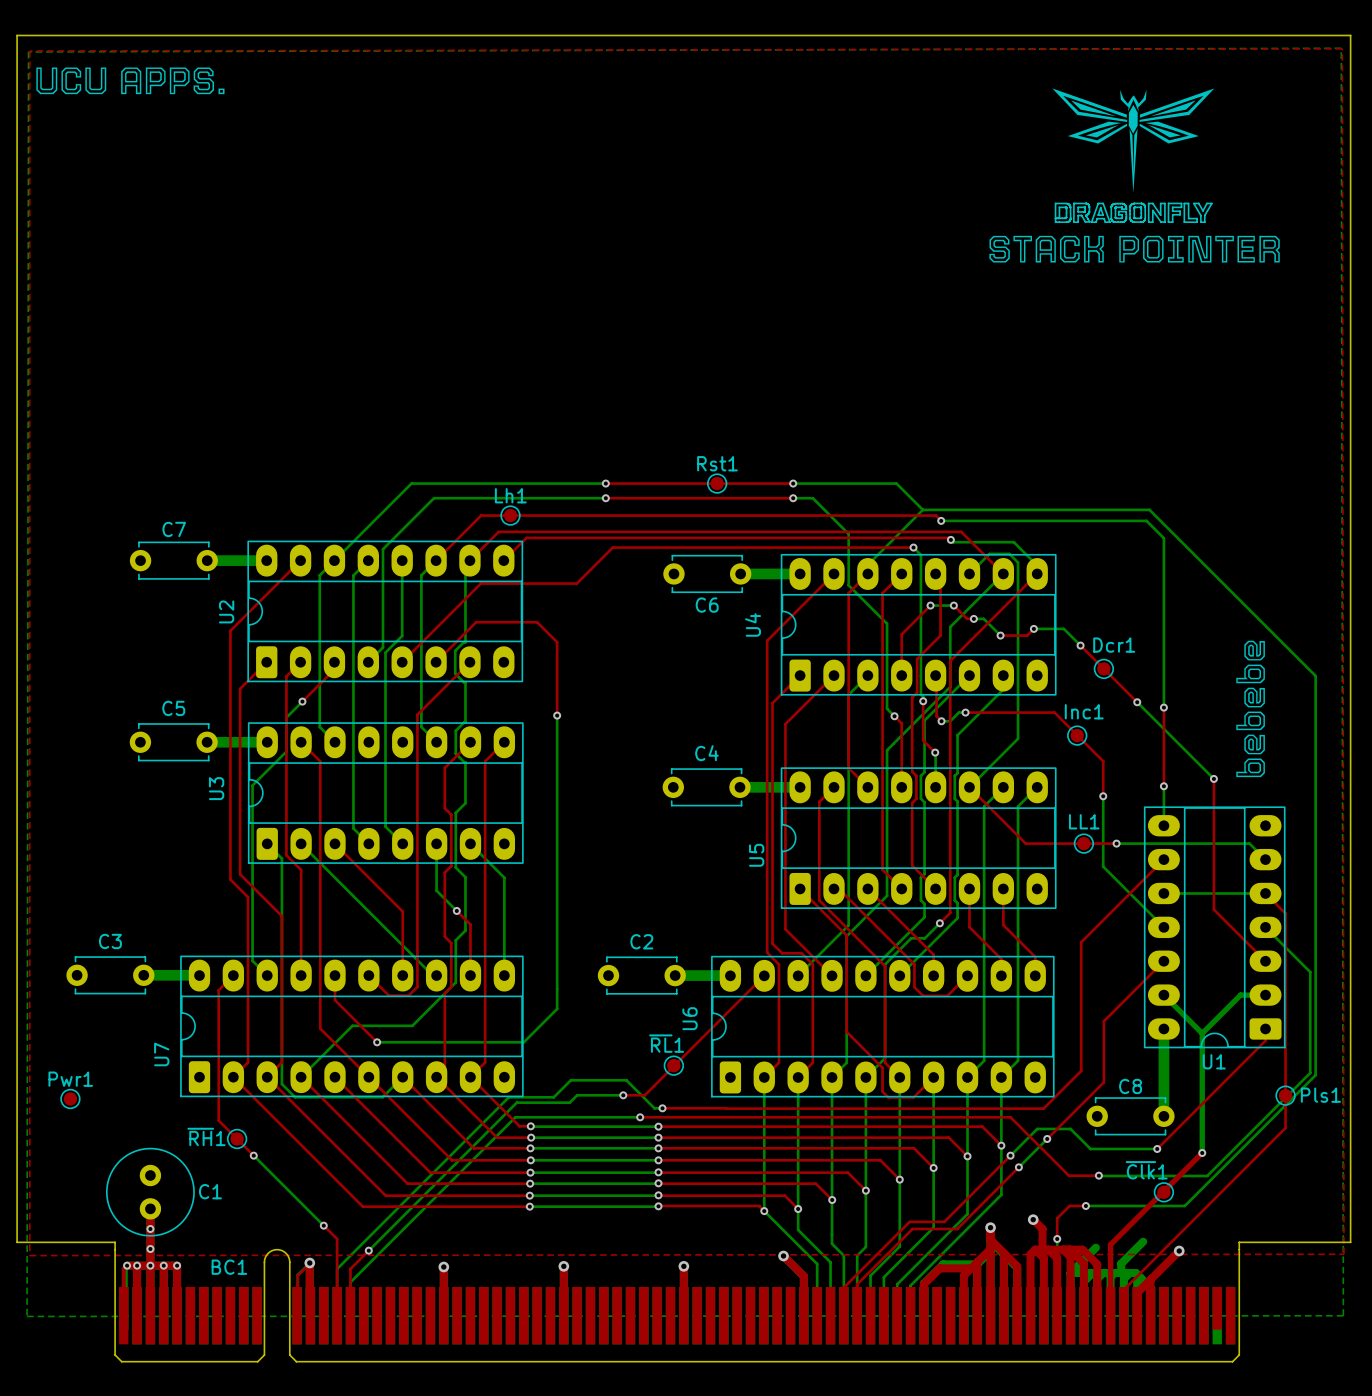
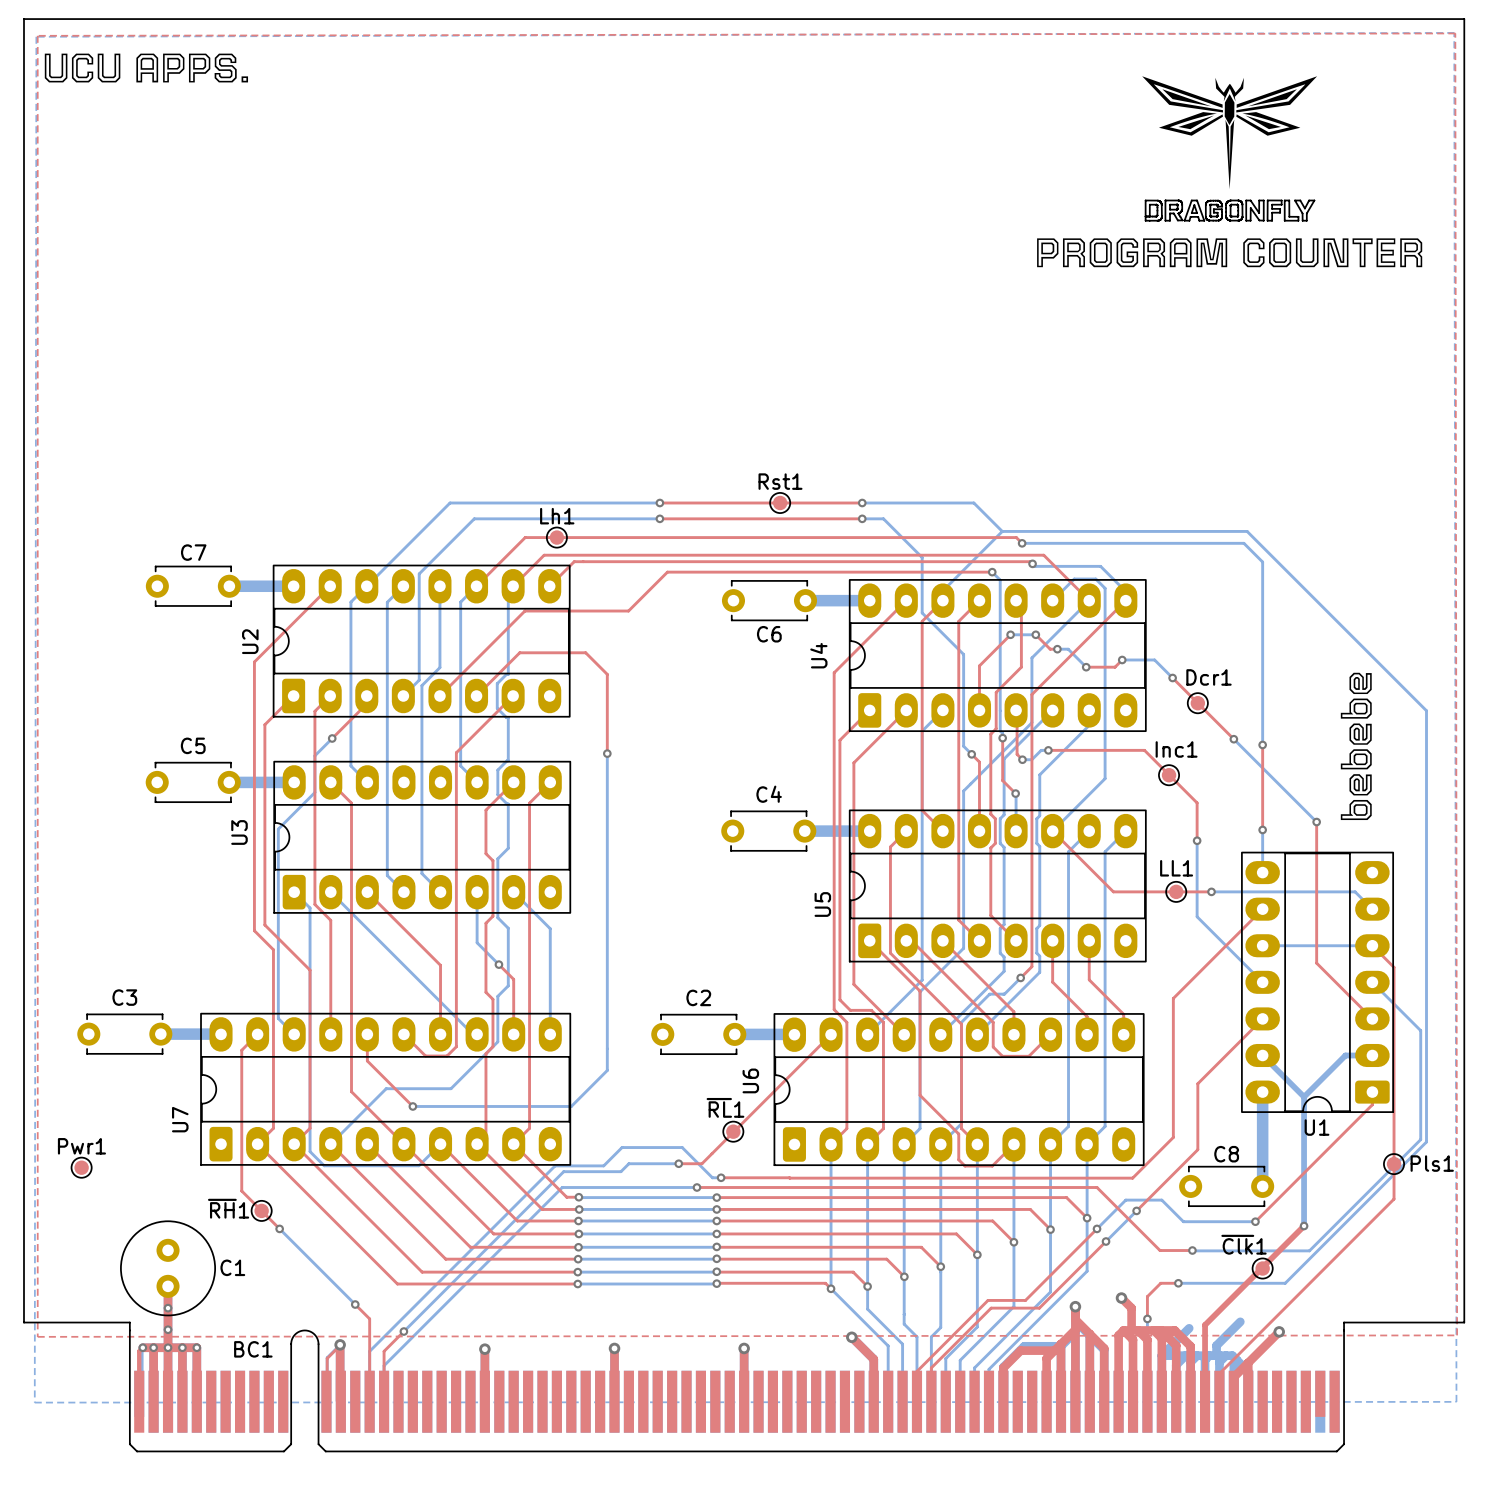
drawing shape: [989, 235, 1280, 263] -> [1037, 238, 1423, 268]

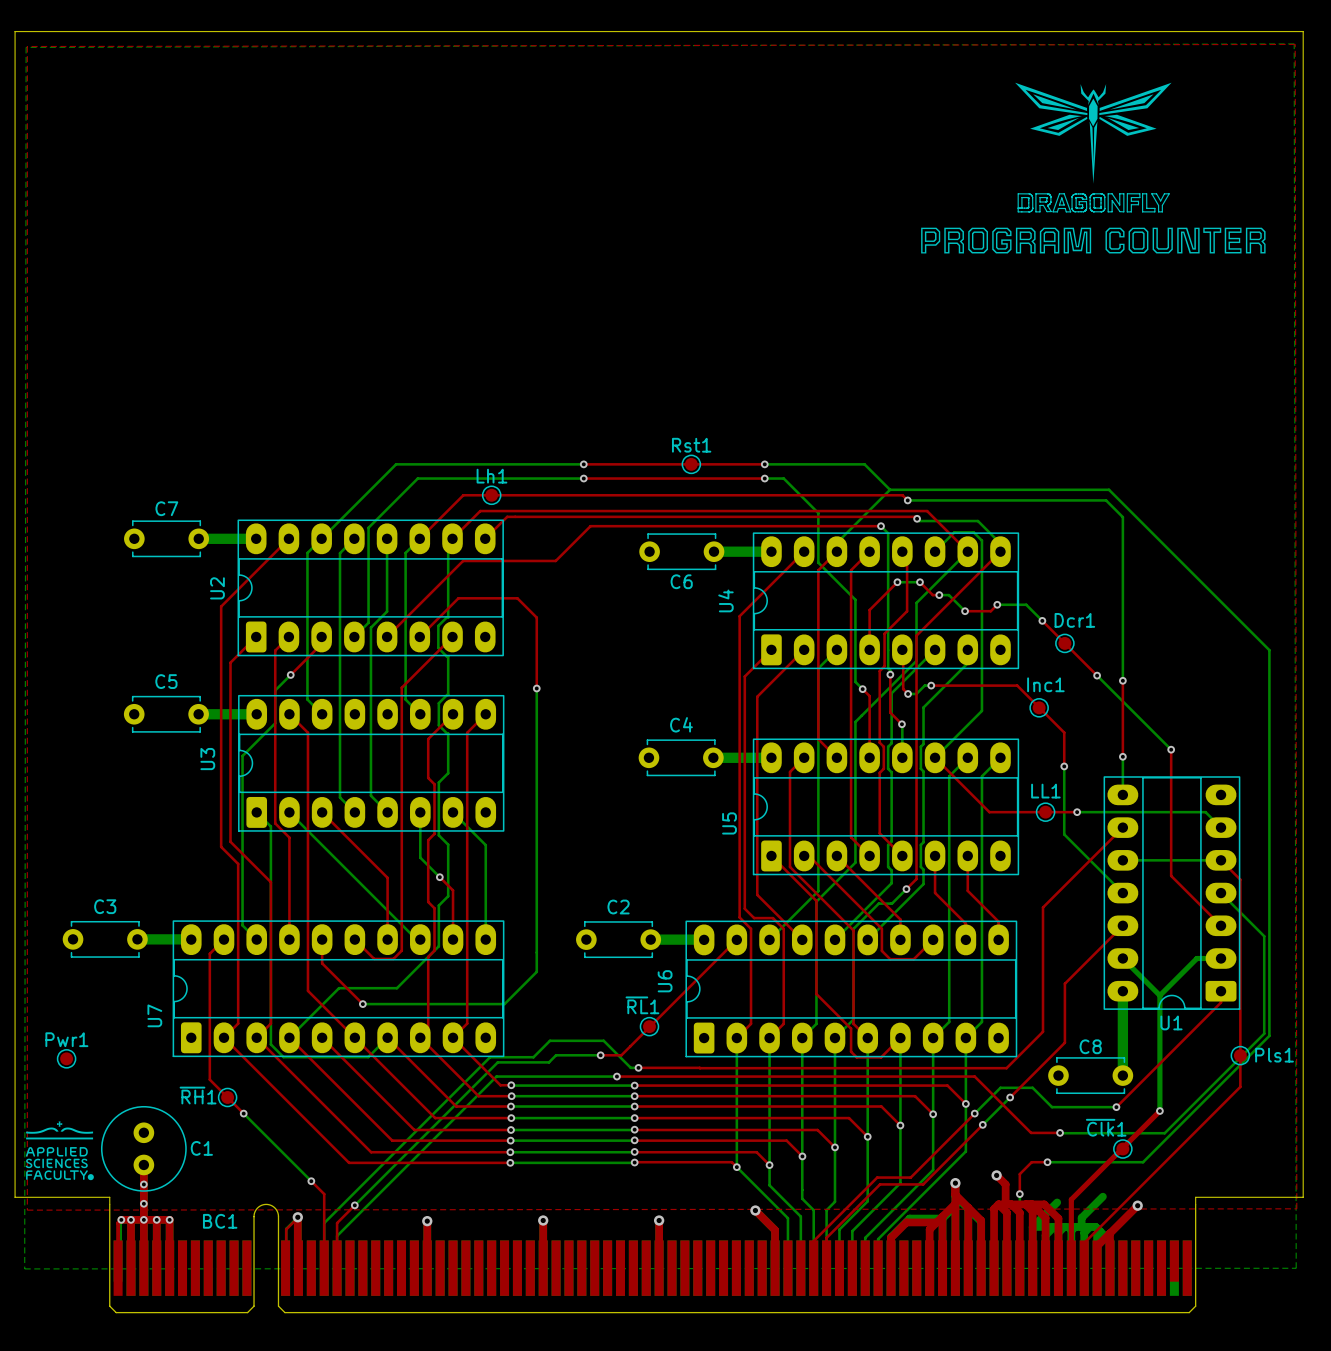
drawing: [44, 53, 249, 83] -> none
drawing: [1340, 672, 1372, 821] -> none
drawing: none -> [25, 1121, 94, 1181]

